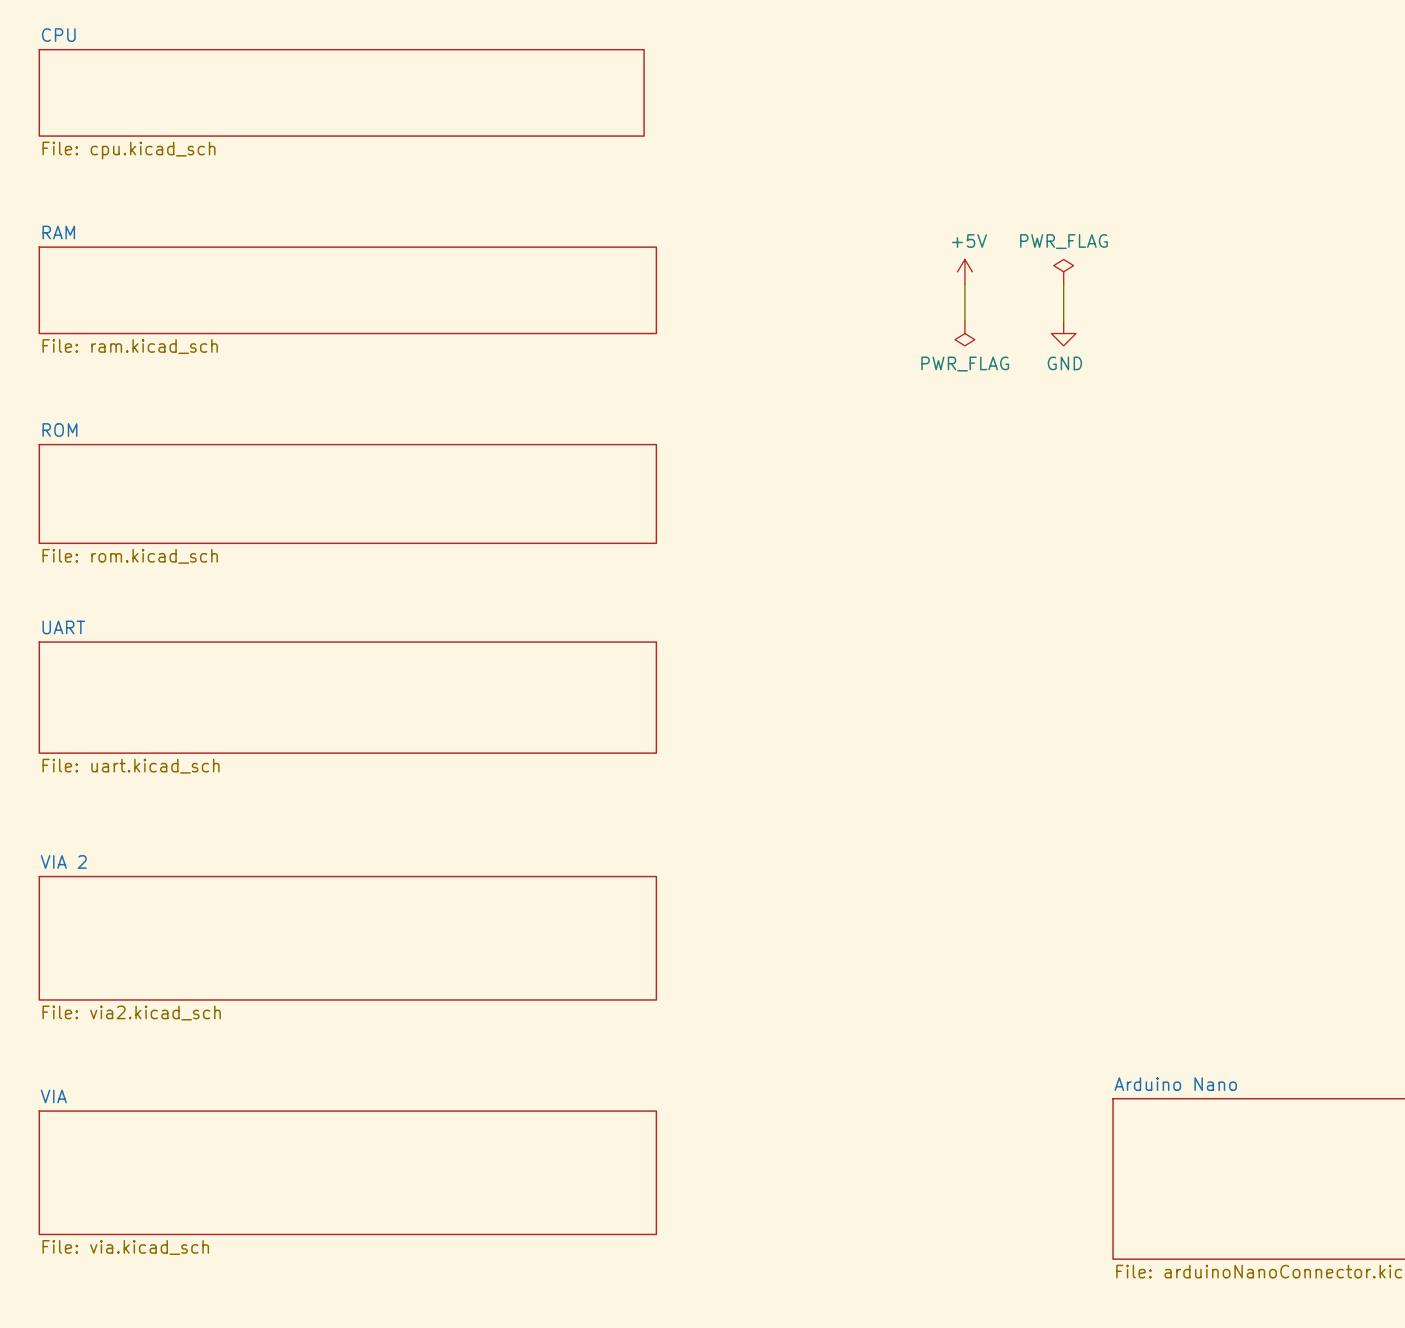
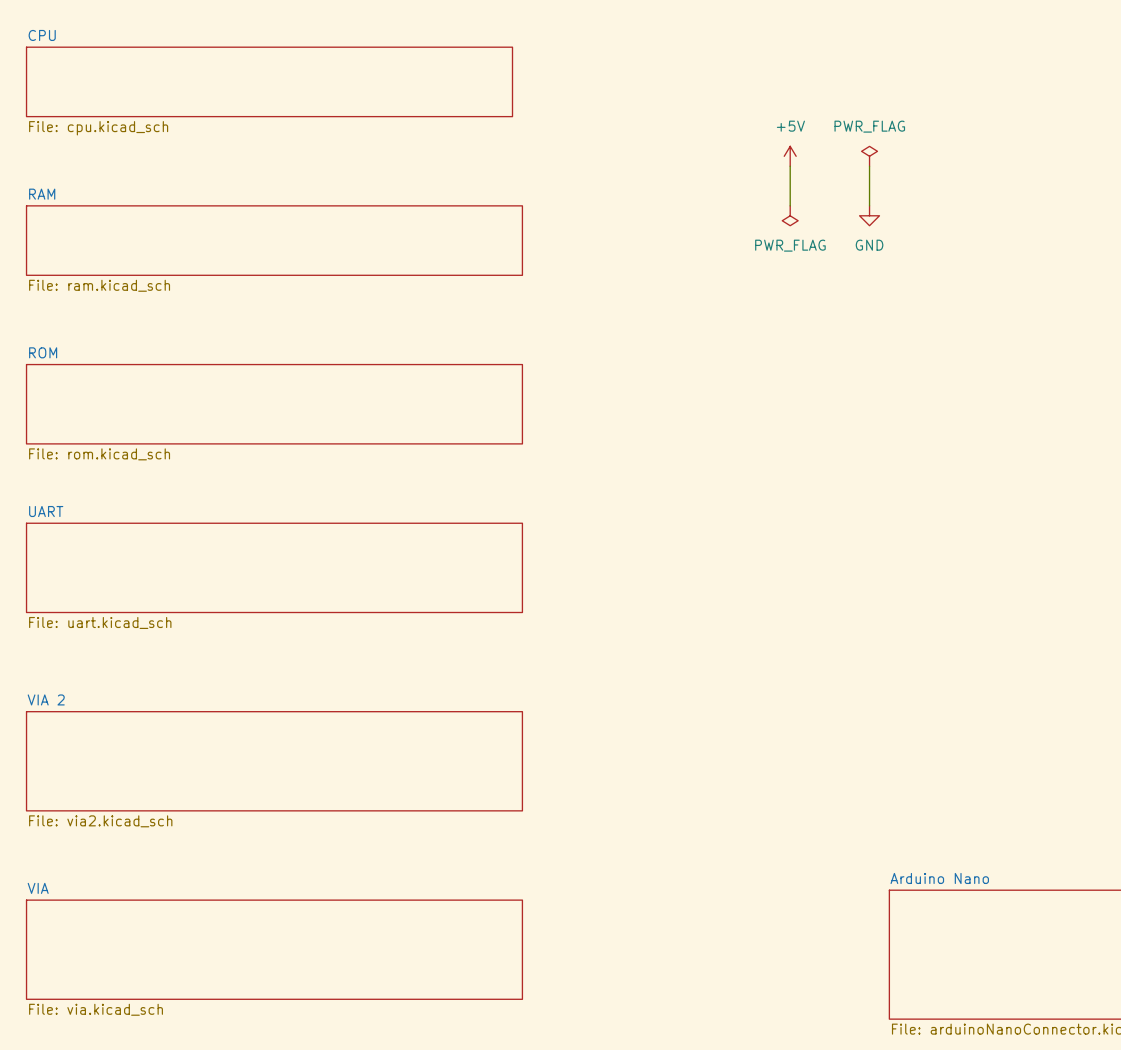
power symbol: none -> PWR_FLAG (869, 156)
wire: none -> (790, 166) (790, 205)
wire: none -> (869, 166) (869, 205)
power symbol text position: +5V (969, 240) -> +5V (790, 126)
power symbol: none -> PWR_FLAG (790, 215)
power symbol position: +5V (964, 271) -> +5V (790, 156)
power symbol: PWR_FLAG (1063, 271) -> none
wire: (964, 284) (964, 321) -> none
wire: (1063, 284) (1063, 321) -> none
power symbol: PWR_FLAG (964, 333) -> none
power symbol position: GND (1063, 333) -> GND (869, 215)
power symbol text position: GND (1064, 363) -> GND (869, 245)

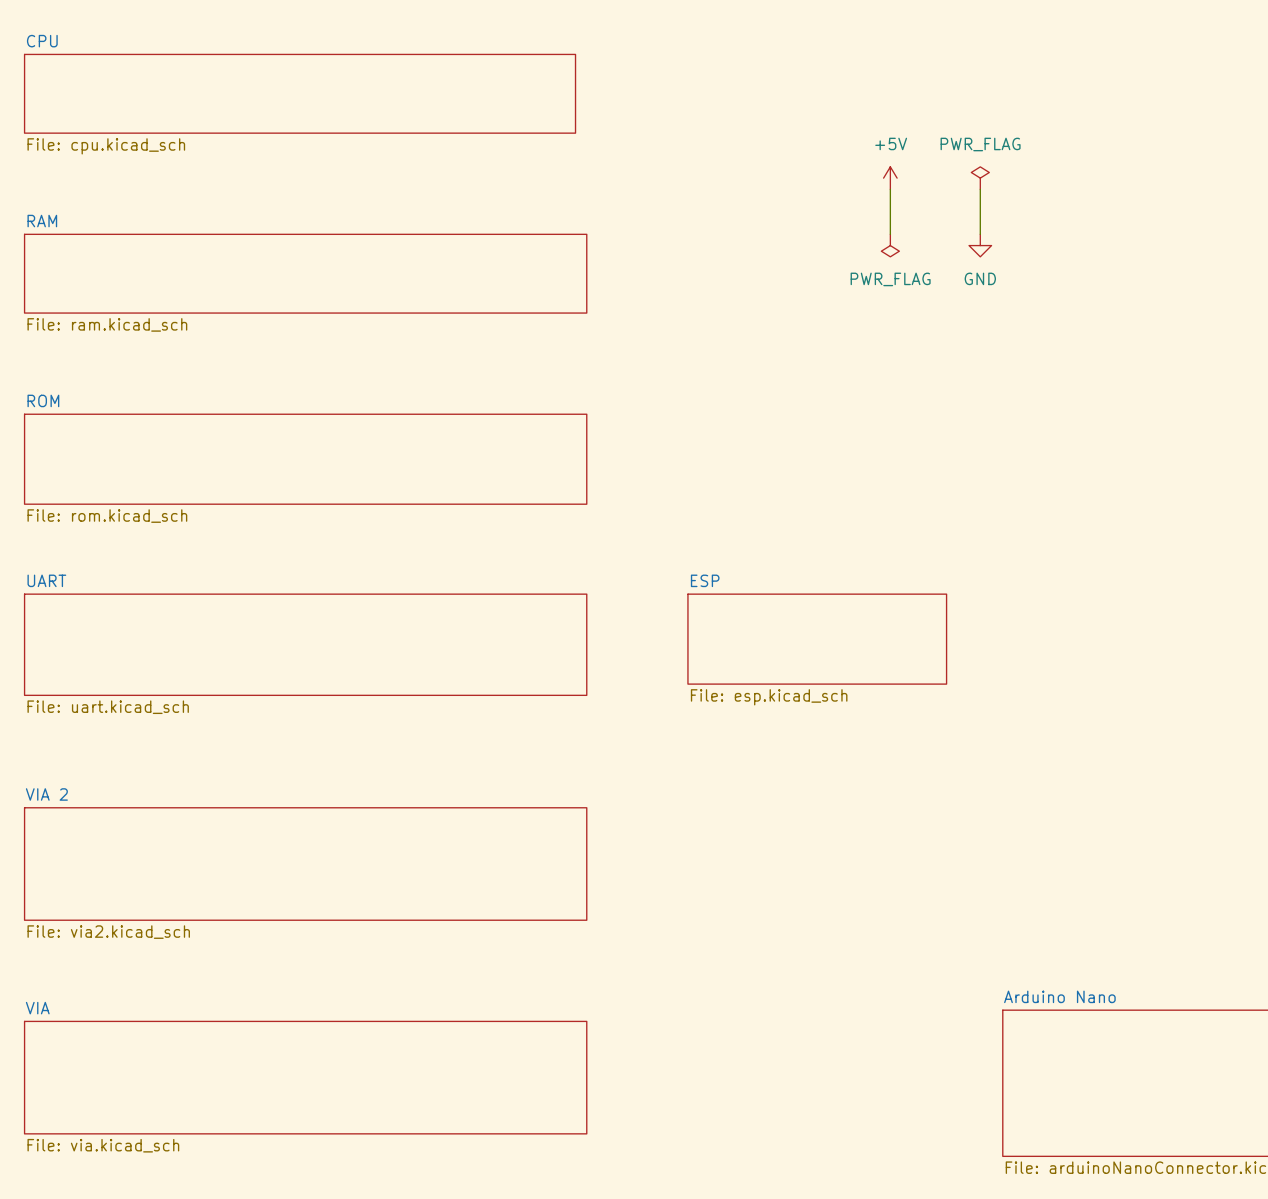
sheet ESP: none -> File: esp.kicad_sch (817, 639)

